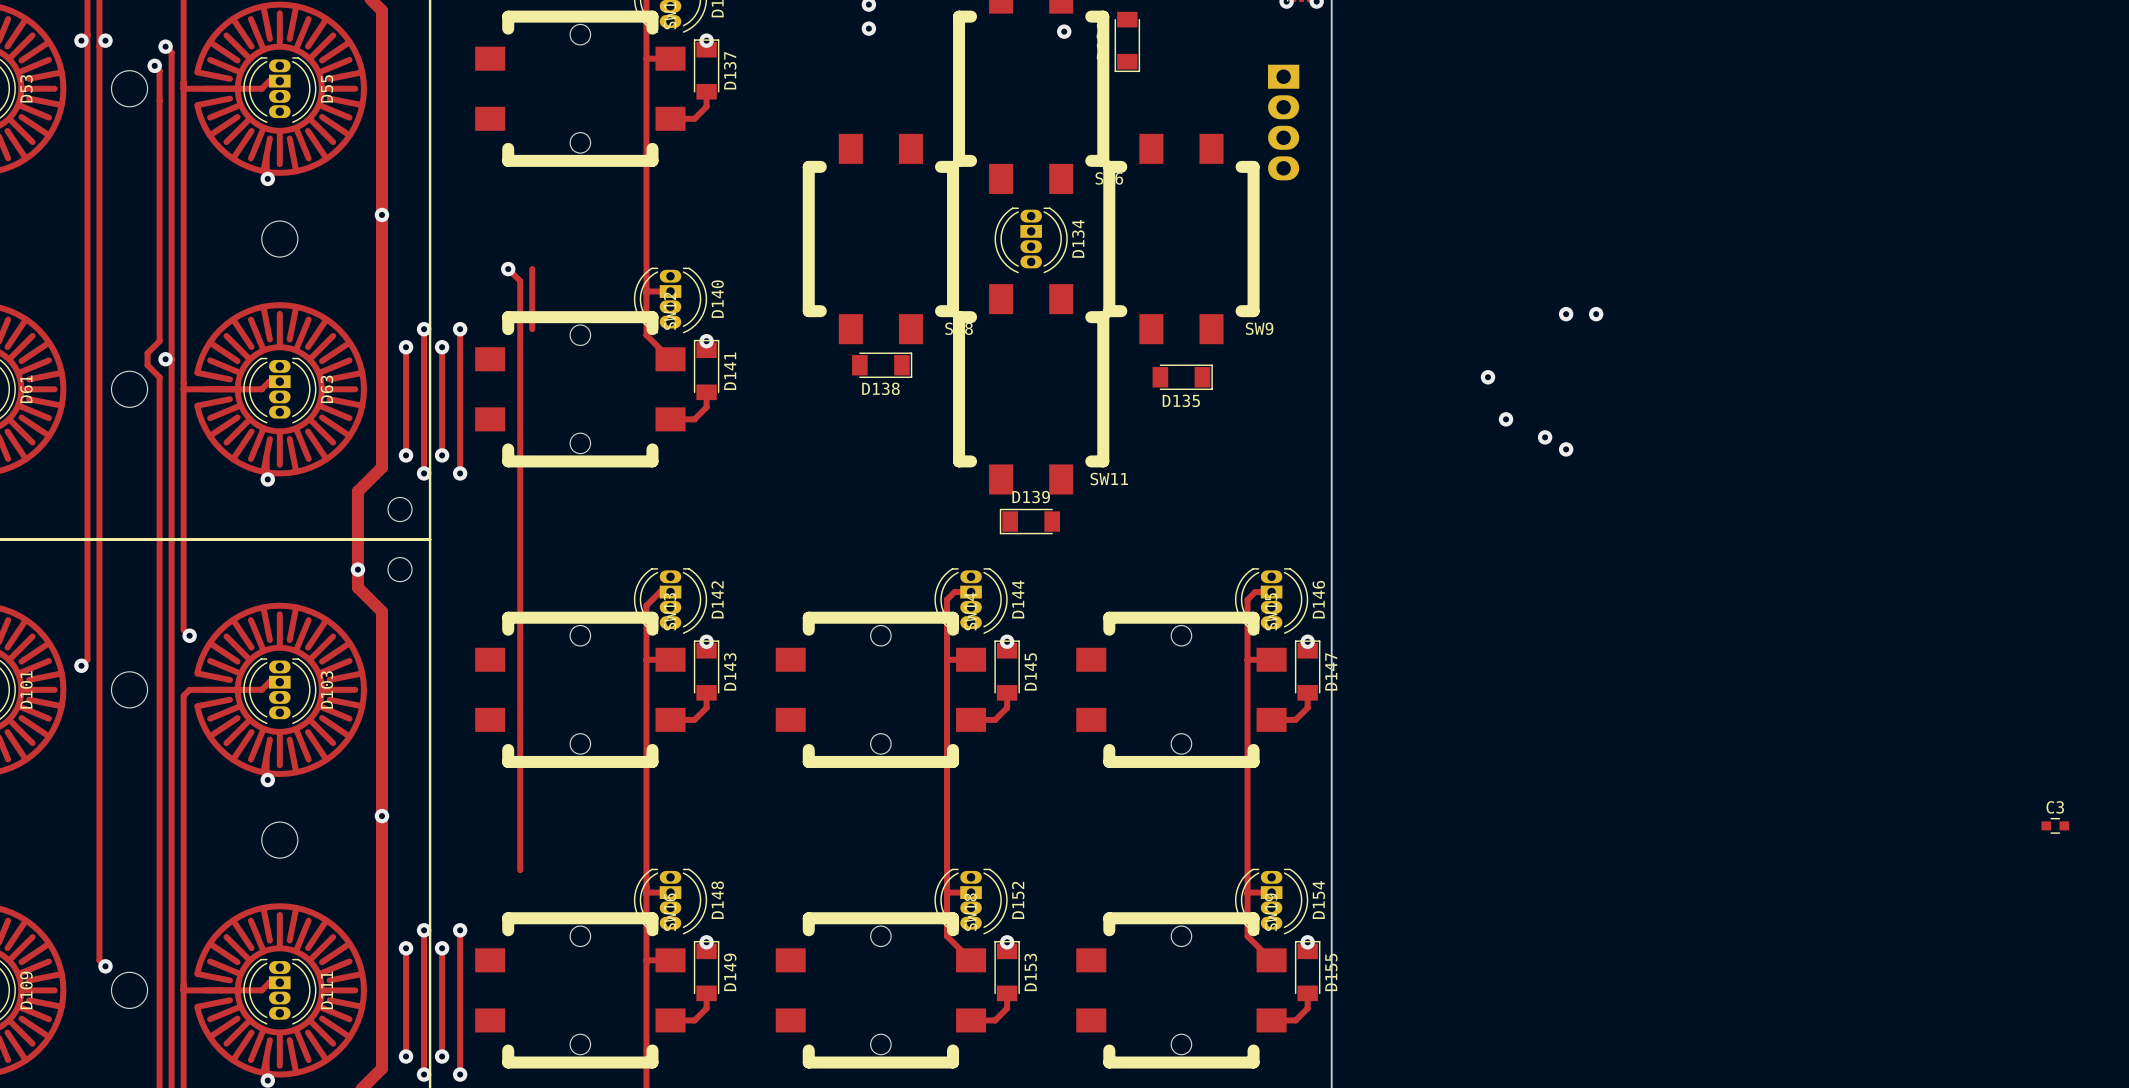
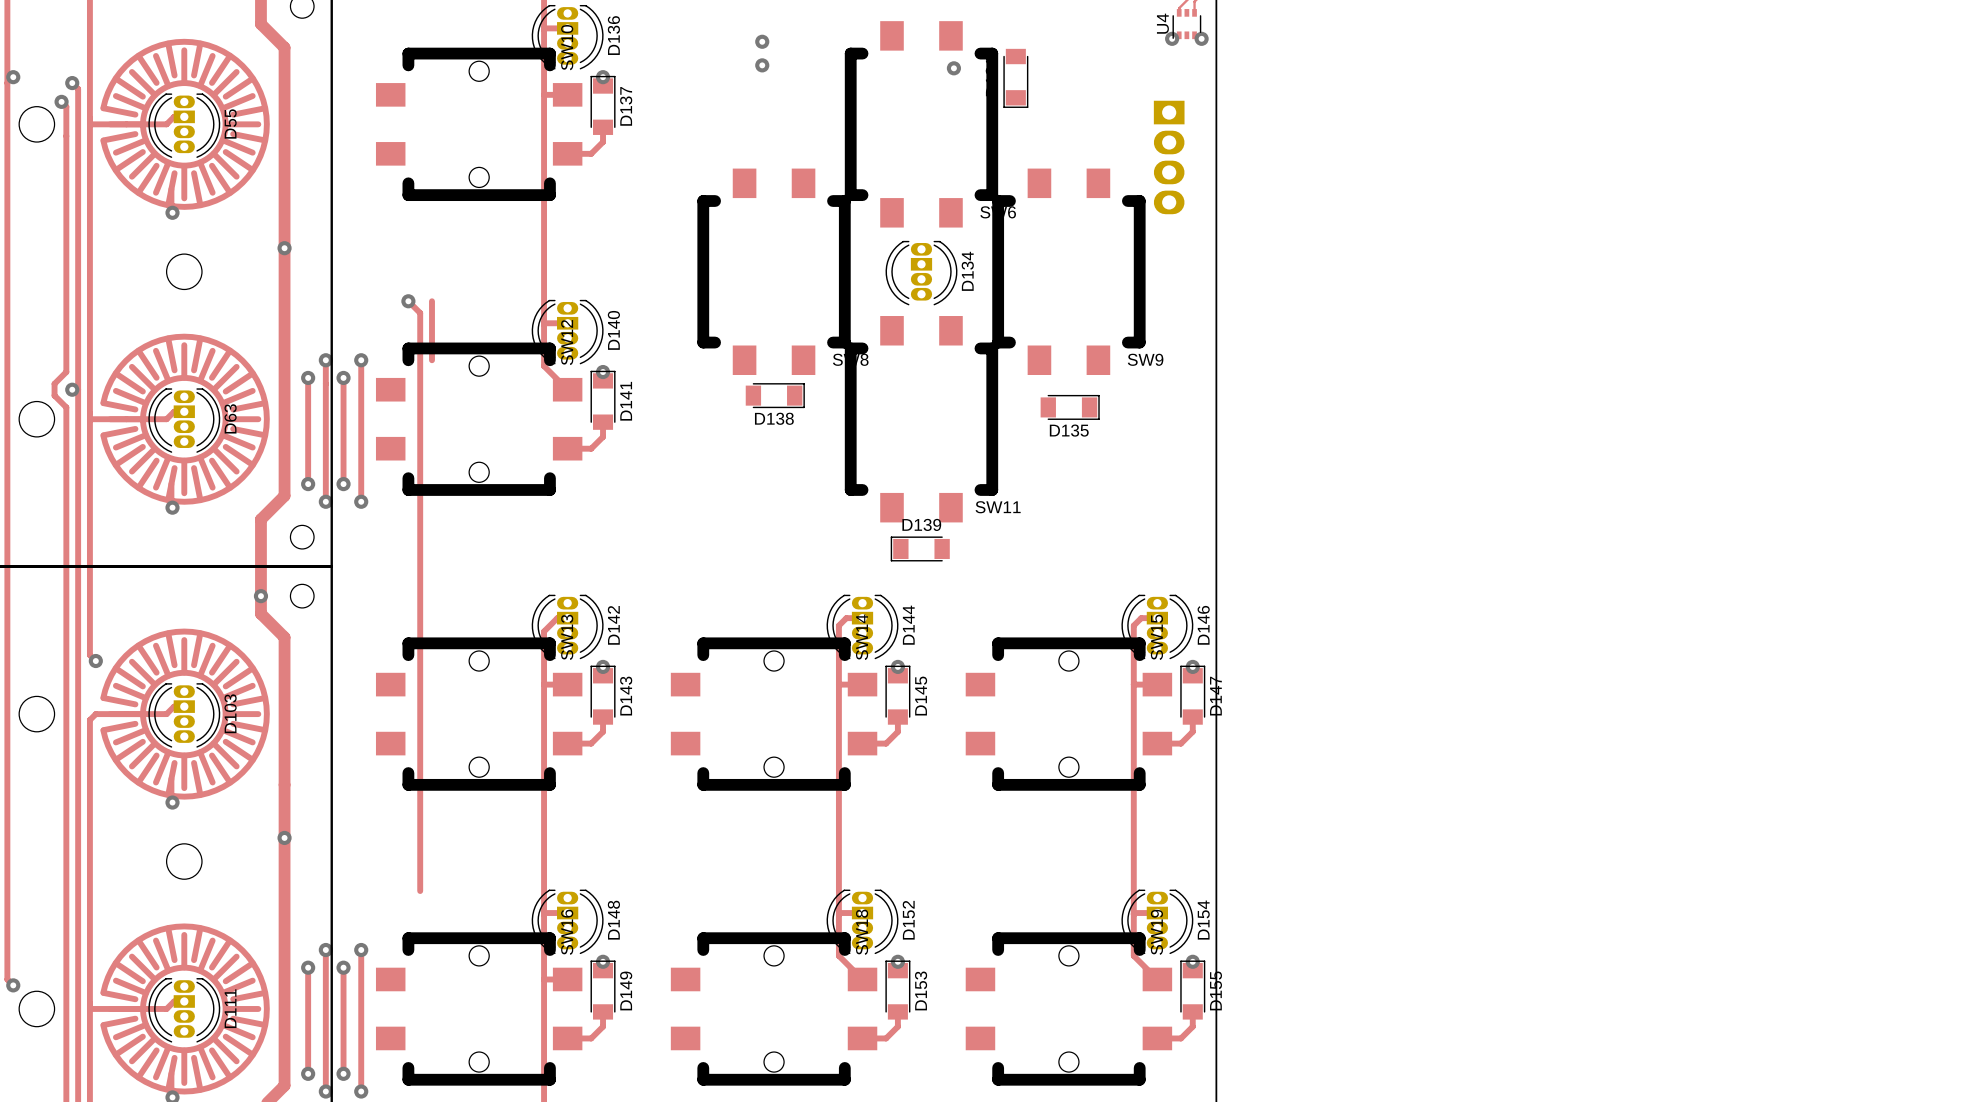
via: (1566, 314) -> none
via: (1596, 314) -> none
via: (1488, 377) -> none
via: (1506, 419) -> none
via: (1545, 437) -> none
via: (1566, 449) -> none
C3: (2055, 825) -> none

